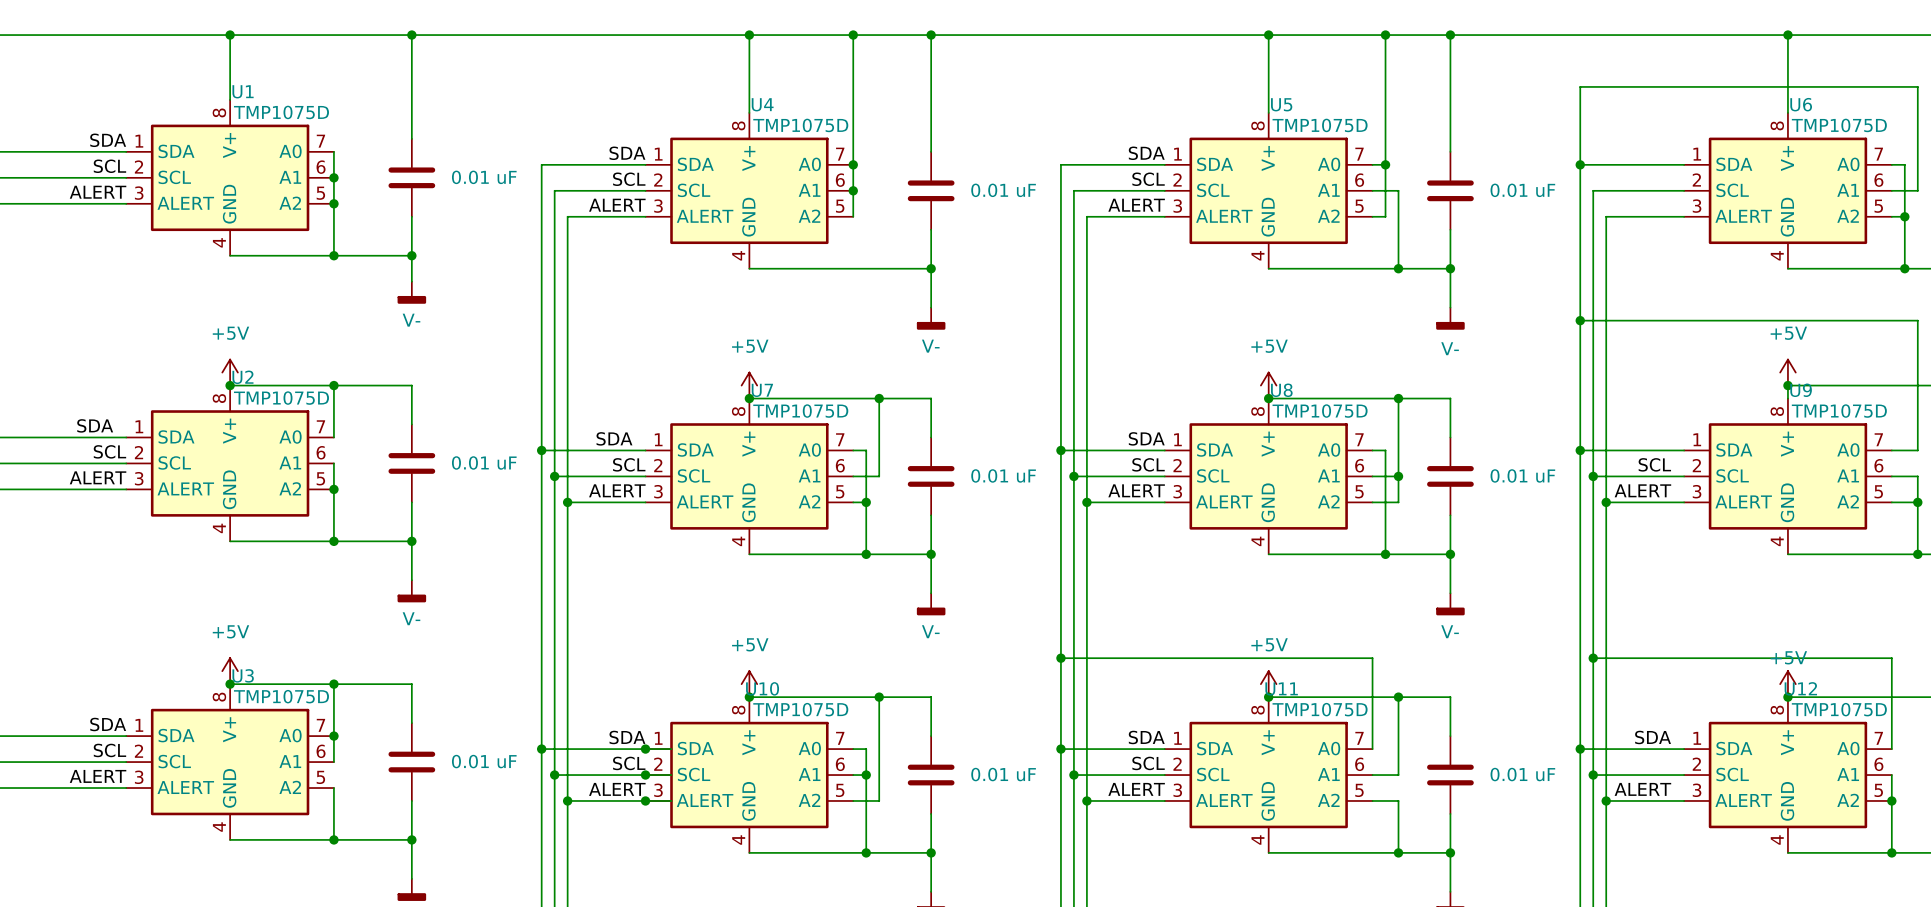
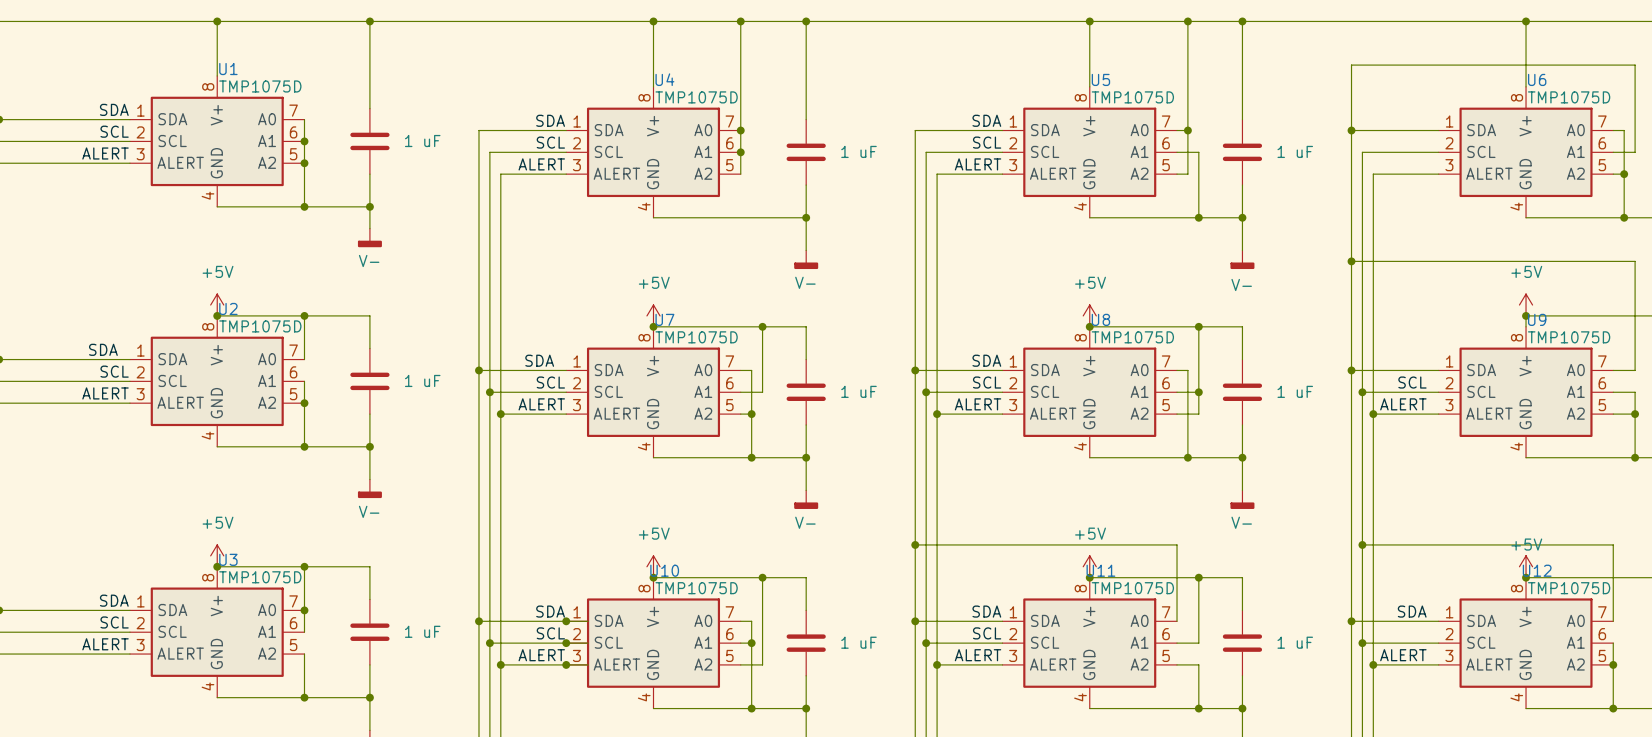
part value: 0.01 uF (484, 177) -> 1 uF (422, 141)
part value: 0.01 uF (1003, 190) -> 1 uF (858, 151)
part value: 0.01 uF (1522, 190) -> 1 uF (1295, 151)
part value: 0.01 uF (484, 462) -> 1 uF (422, 380)
part value: 0.01 uF (1003, 475) -> 1 uF (858, 391)
part value: 0.01 uF (1522, 475) -> 1 uF (1295, 391)
part value: 0.01 uF (484, 761) -> 1 uF (422, 631)
part value: 0.01 uF (1003, 774) -> 1 uF (858, 642)
part value: 0.01 uF (1522, 774) -> 1 uF (1295, 642)

